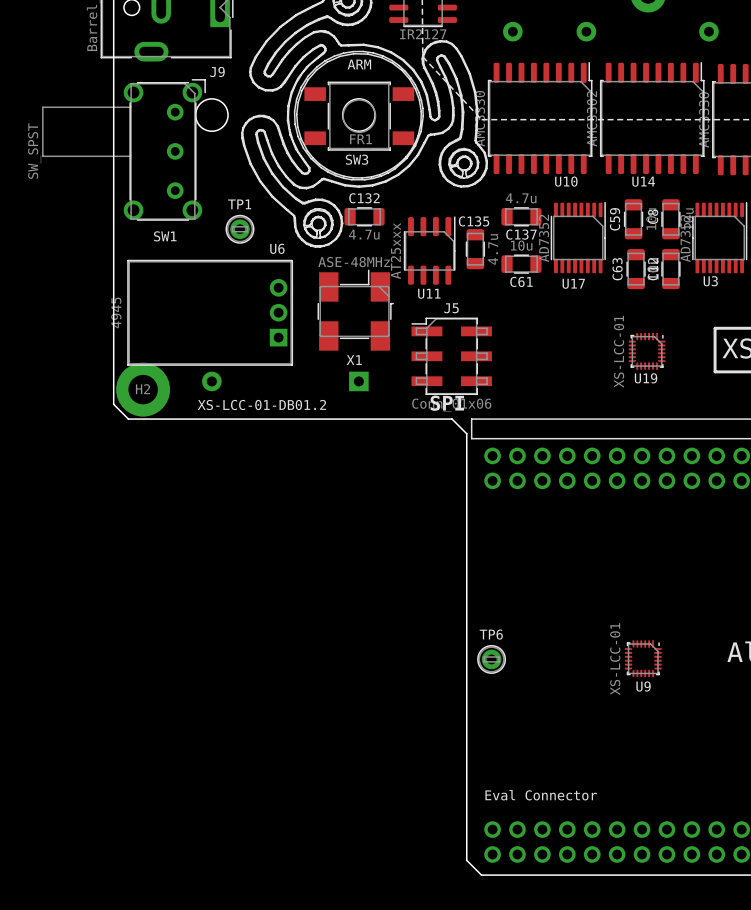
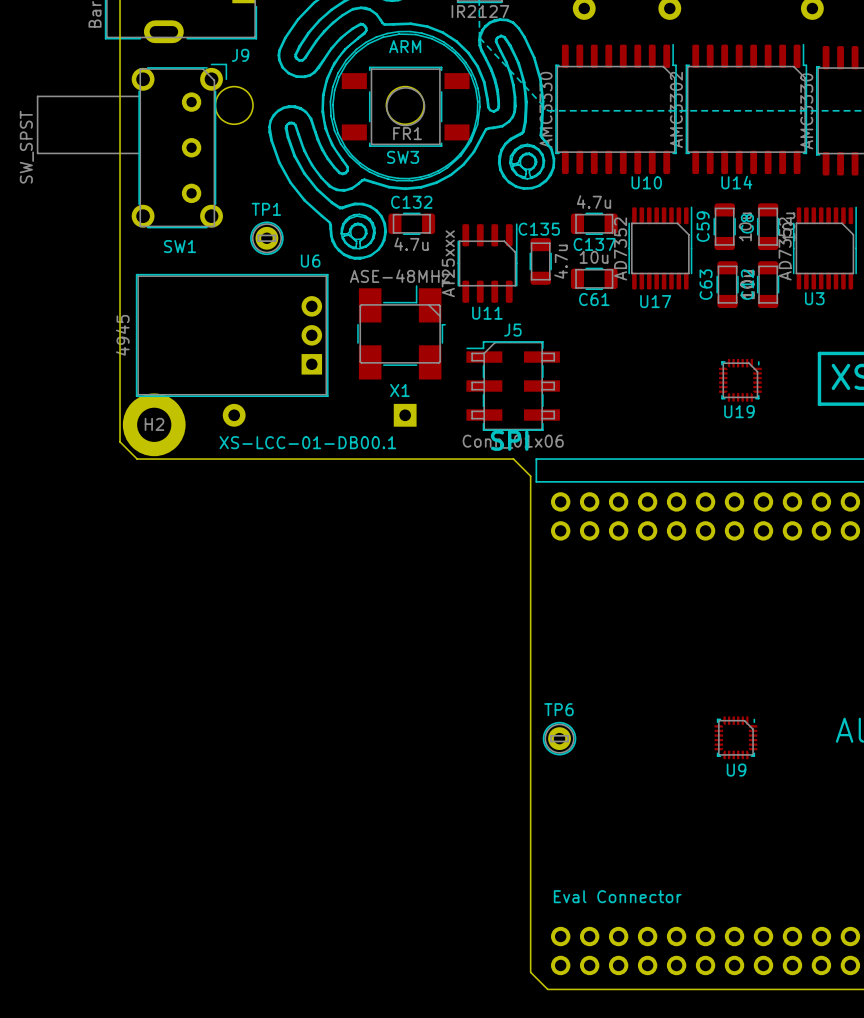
U19 value: XS-LCC-01 (619, 351) -> none
text: XS-LCC-01-DB01.2 (261, 405) -> XS-LCC-01-DB00.1 (307, 442)
U9 value: XS-LCC-01 (615, 659) -> none

